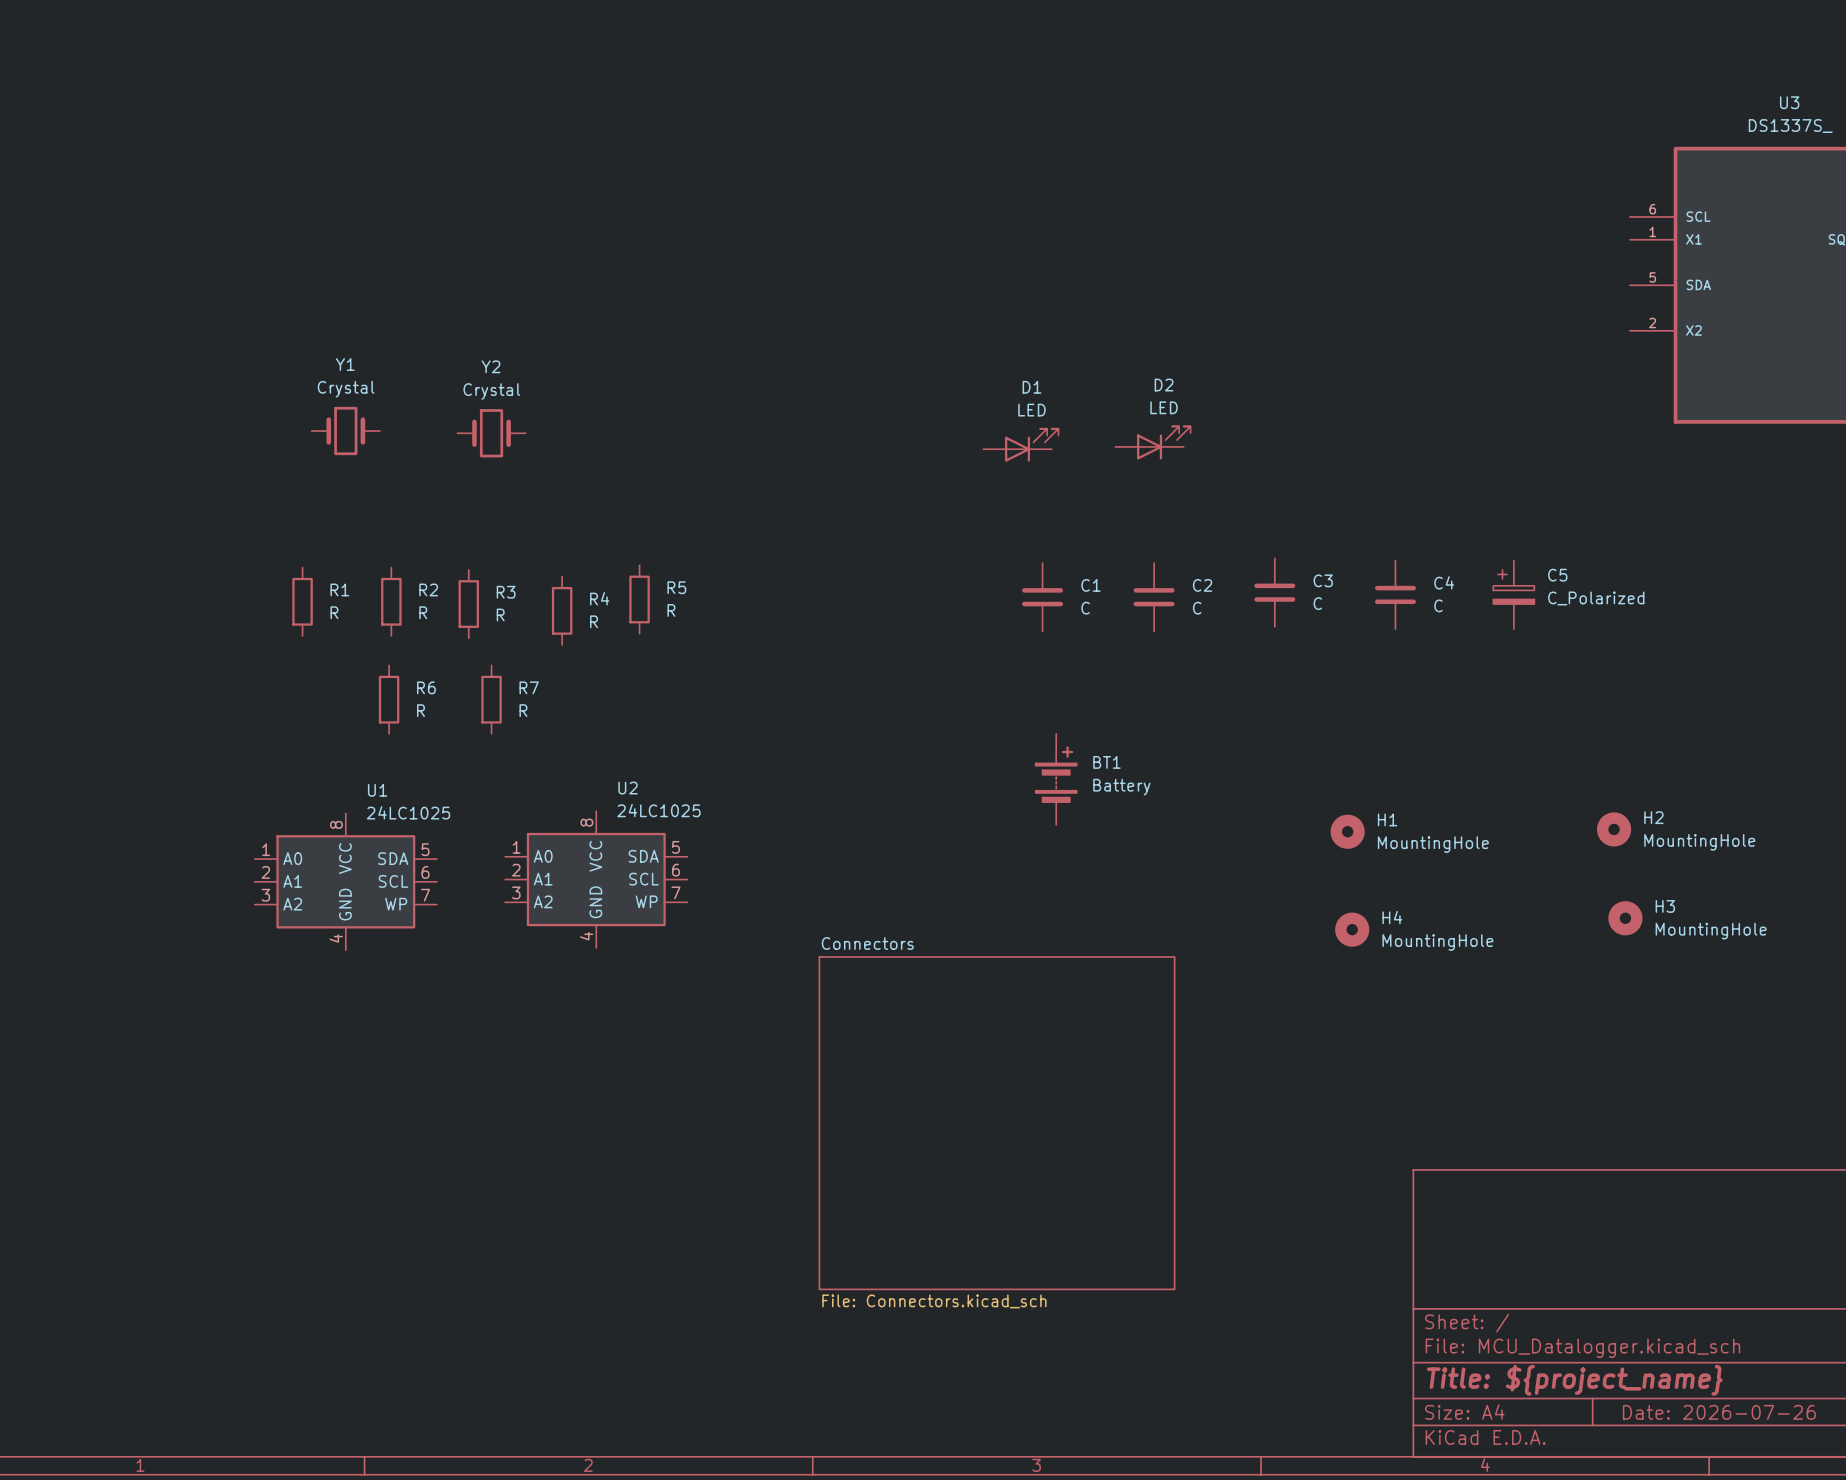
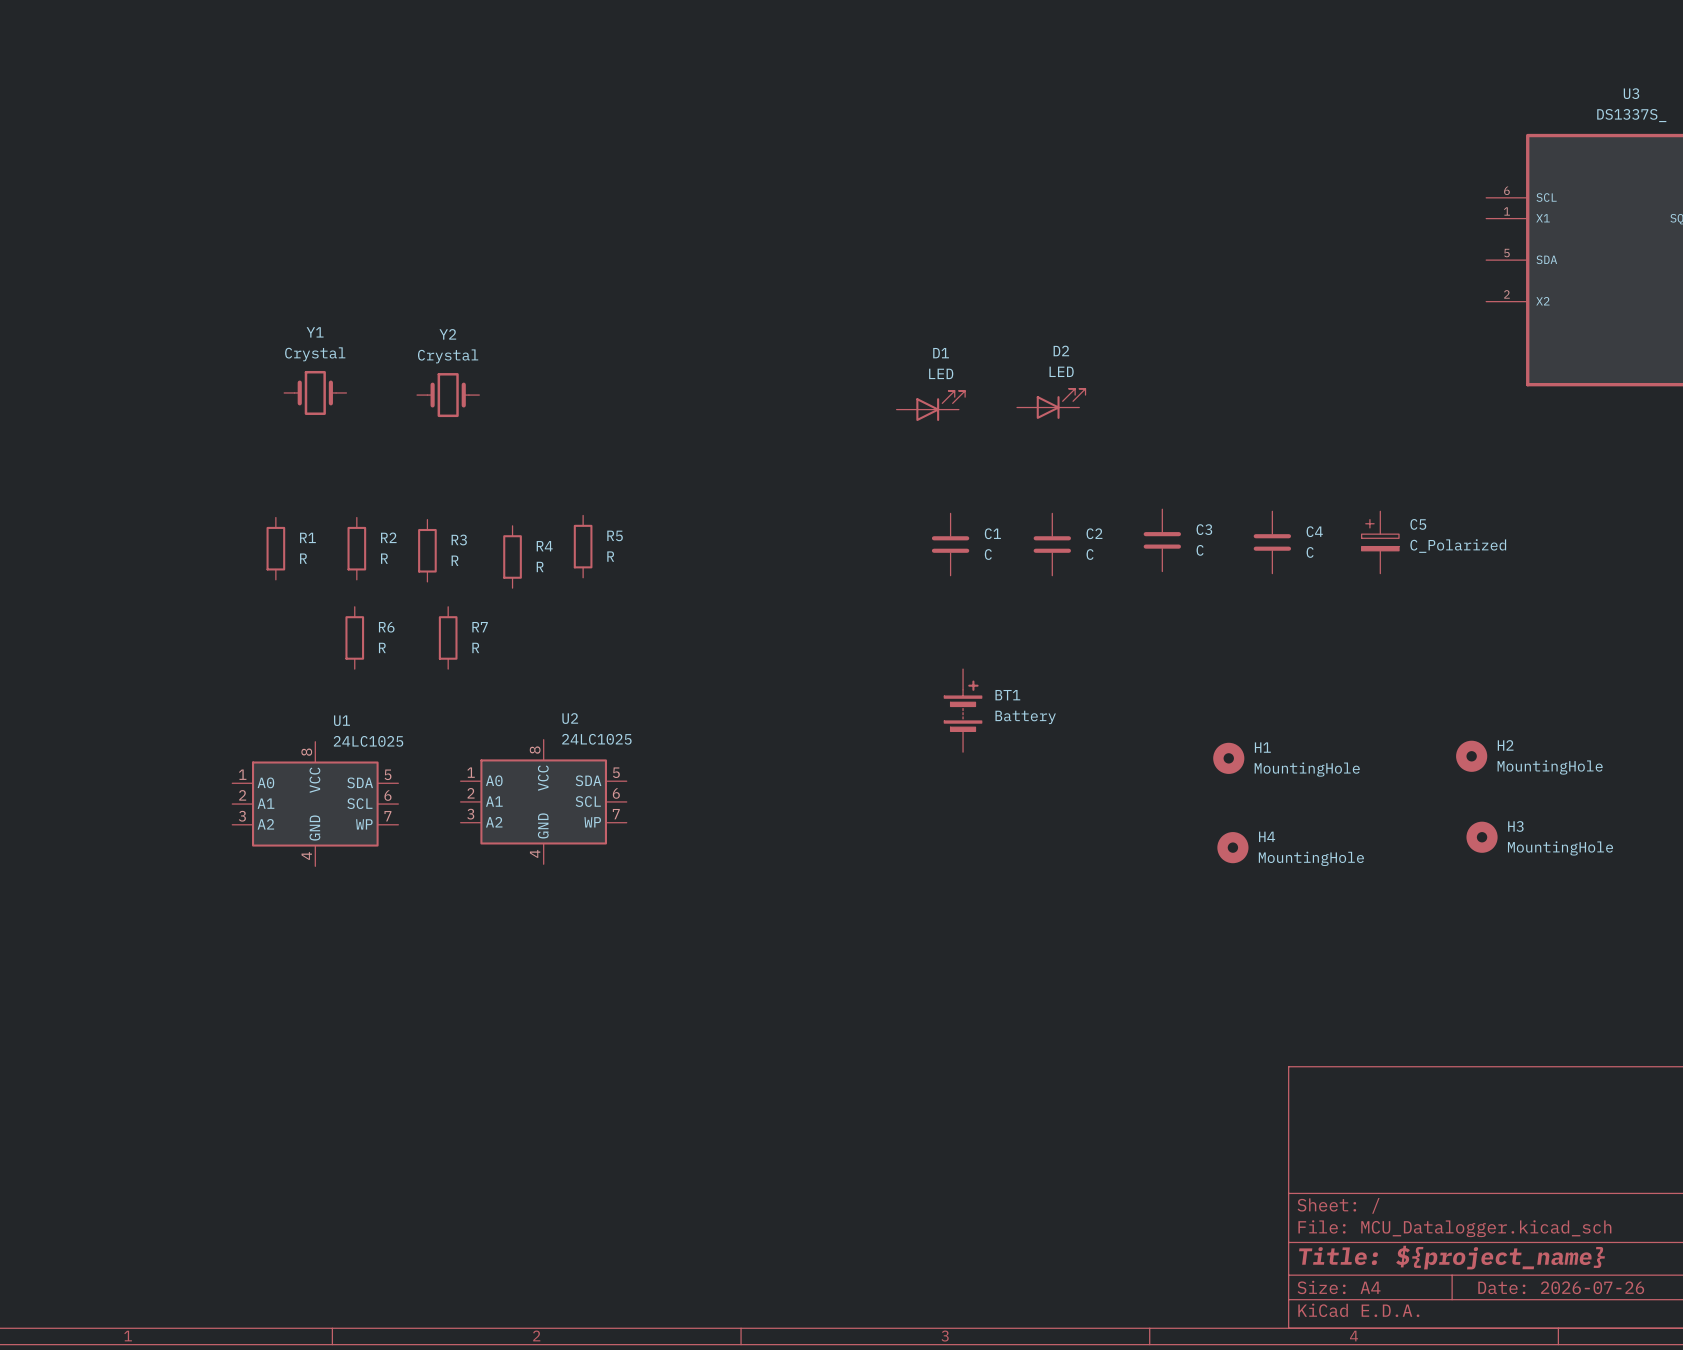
sheet Connectors: File: Connectors.kicad_sch (997, 1123) -> none

